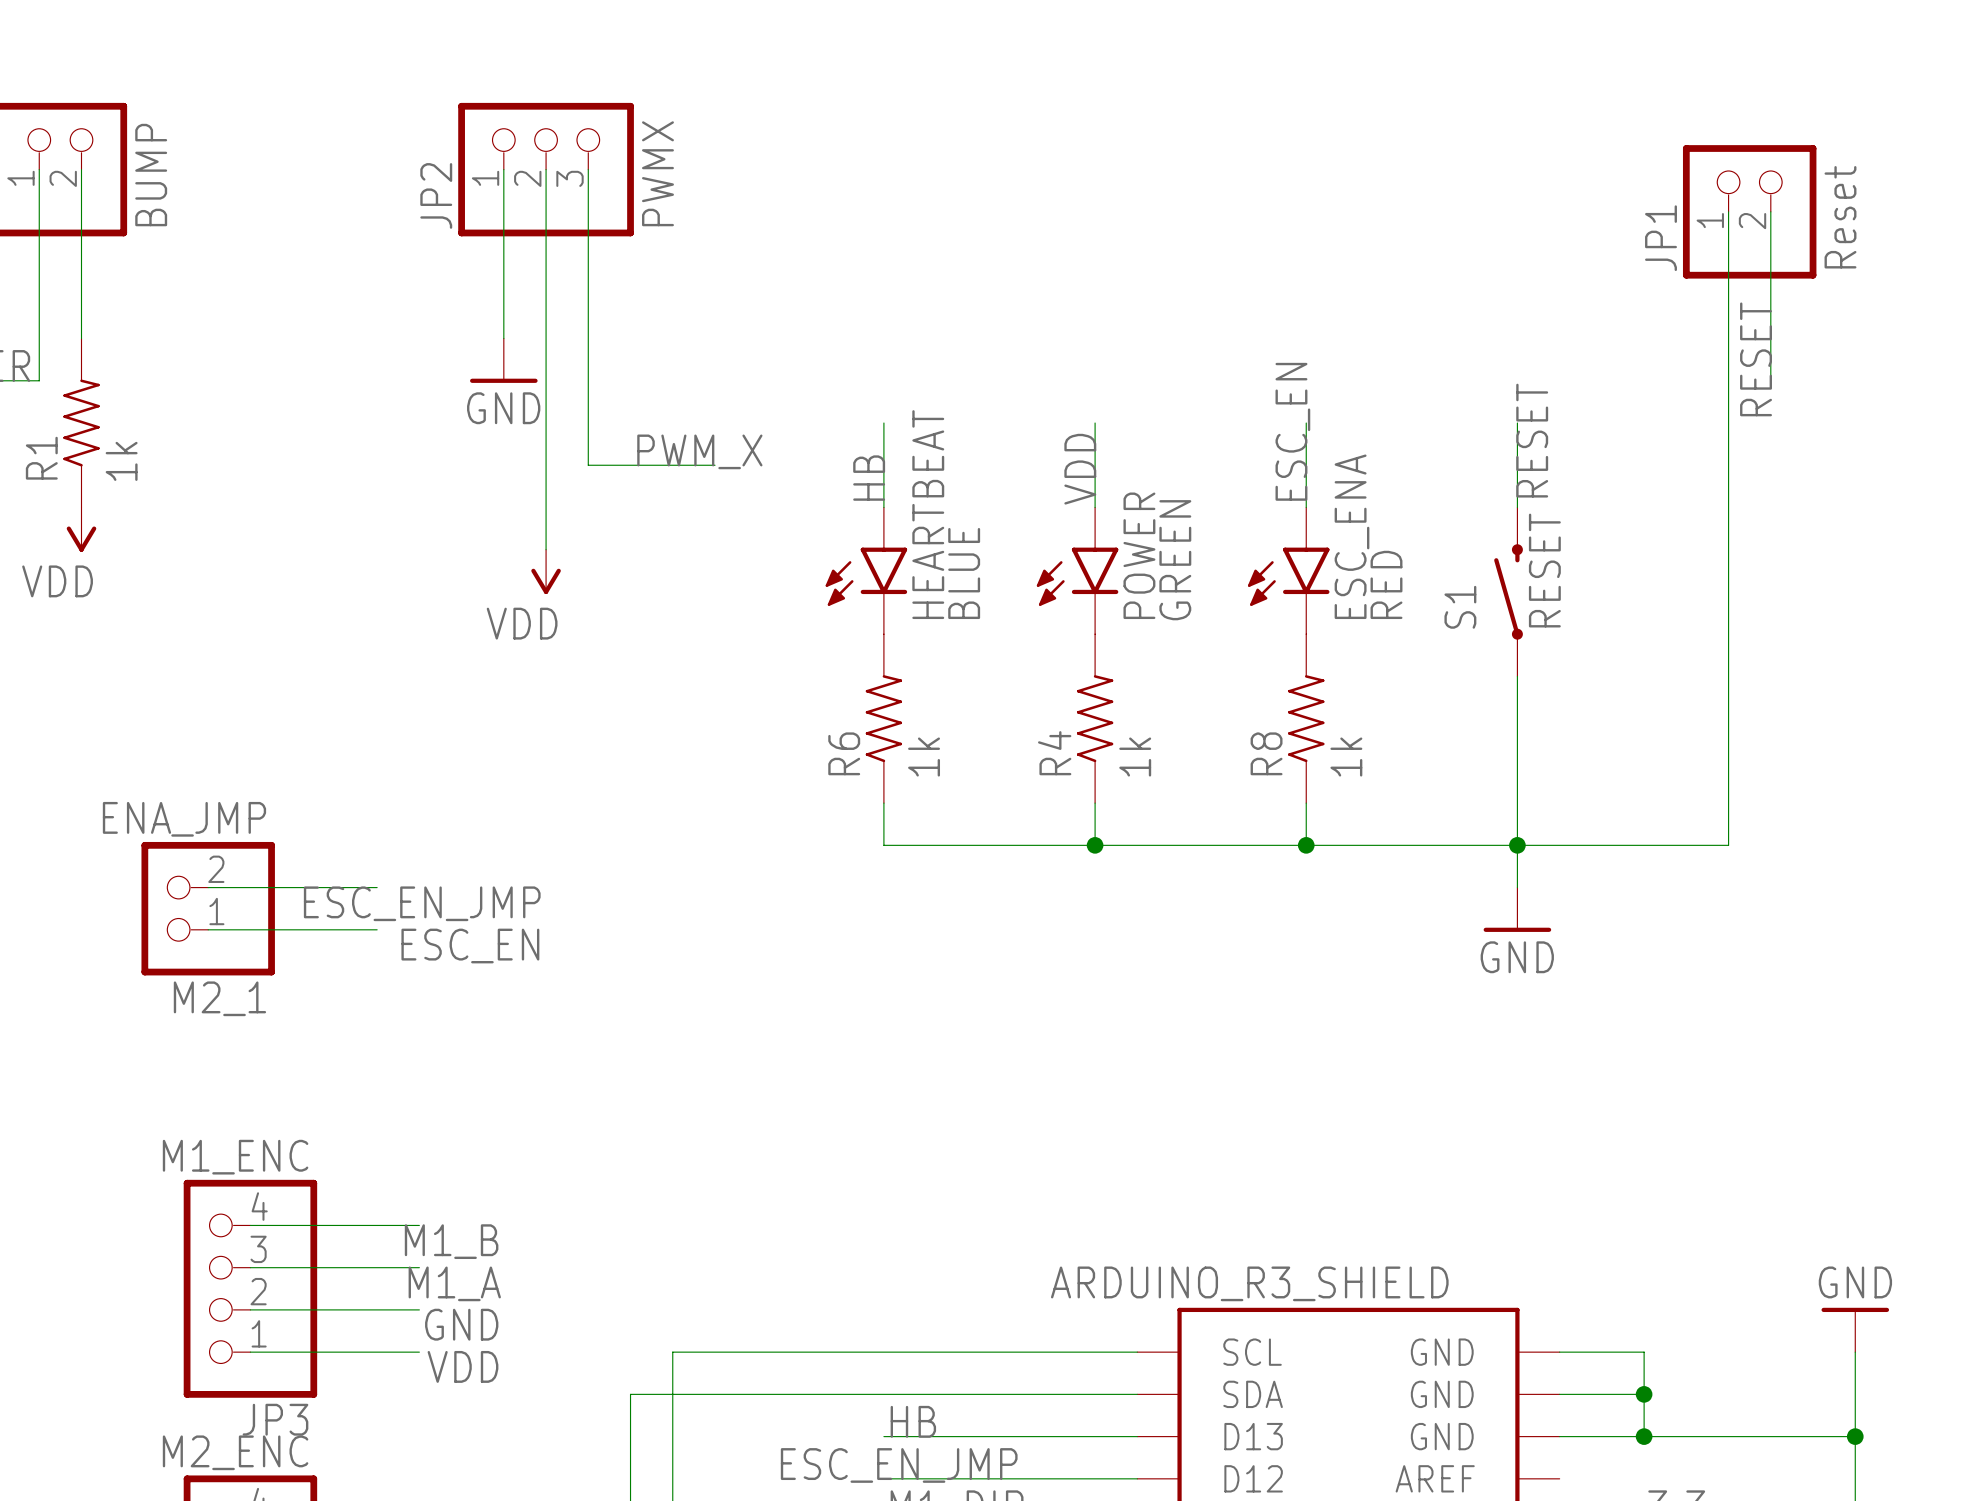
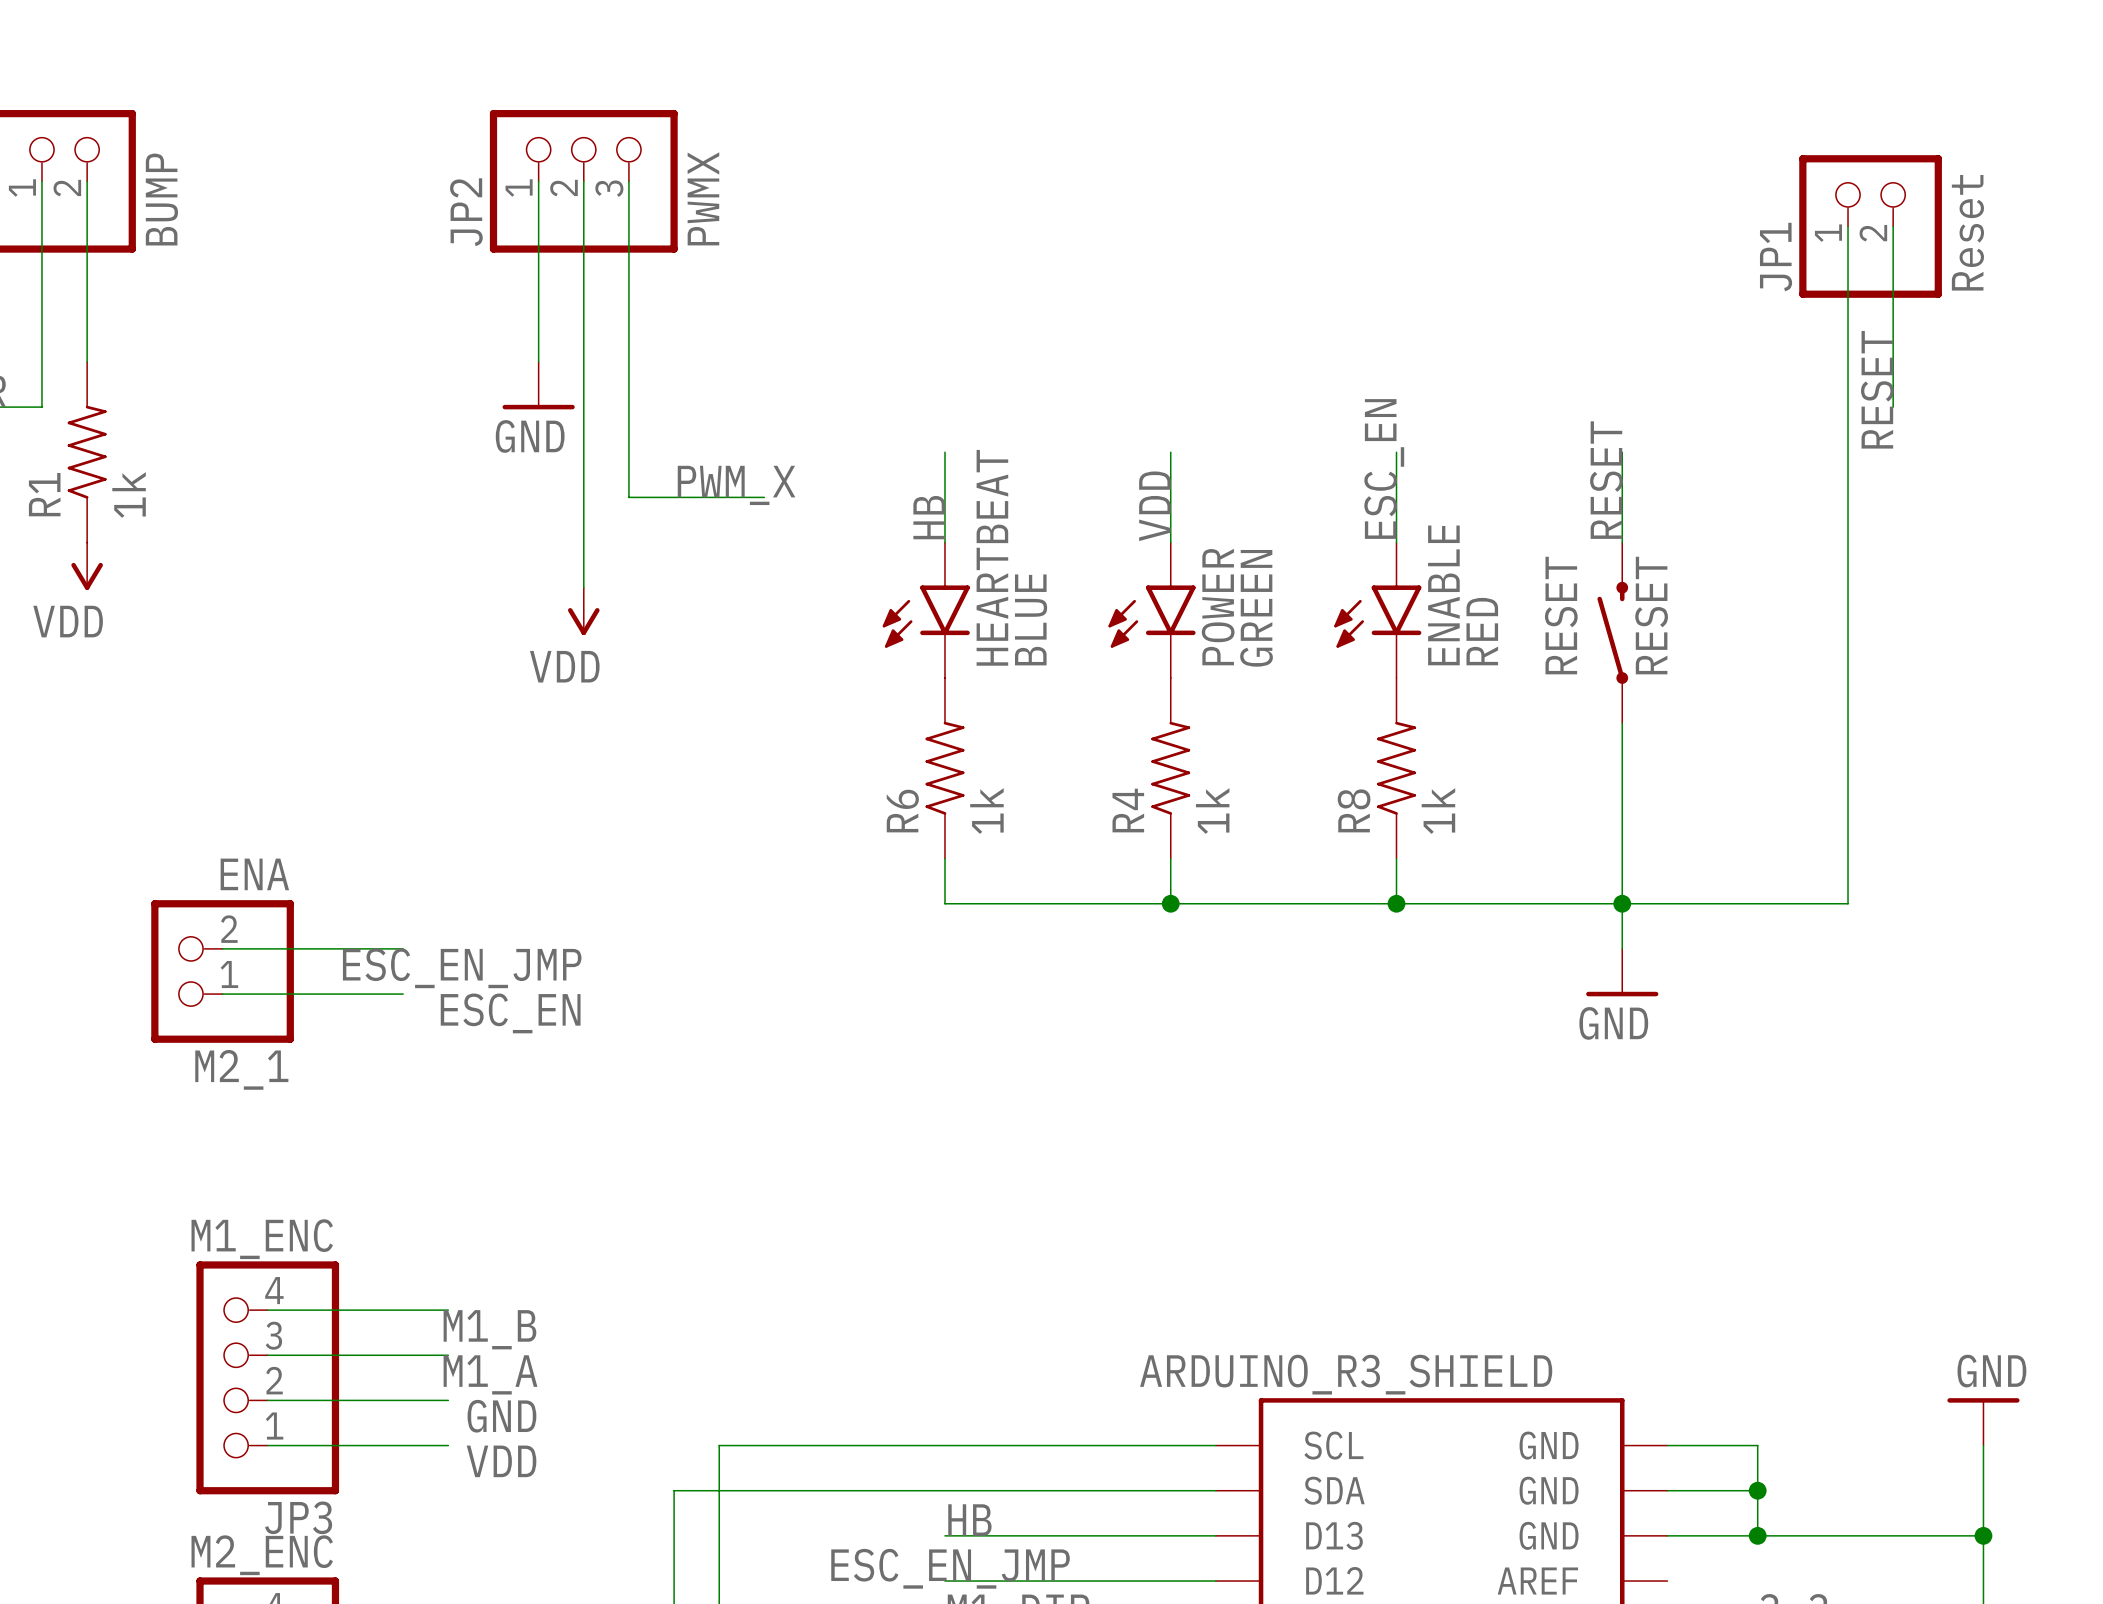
label position: RESET (1532, 440) -> RESET (1606, 480)
ESC_ENA name: ESC_ENA (1352, 536) -> ENABLE (1443, 595)
S1 name: S1 (1460, 607) -> RESET (1561, 615)
M2_1 value: ENA_JMP (184, 819) -> ENA (254, 874)

